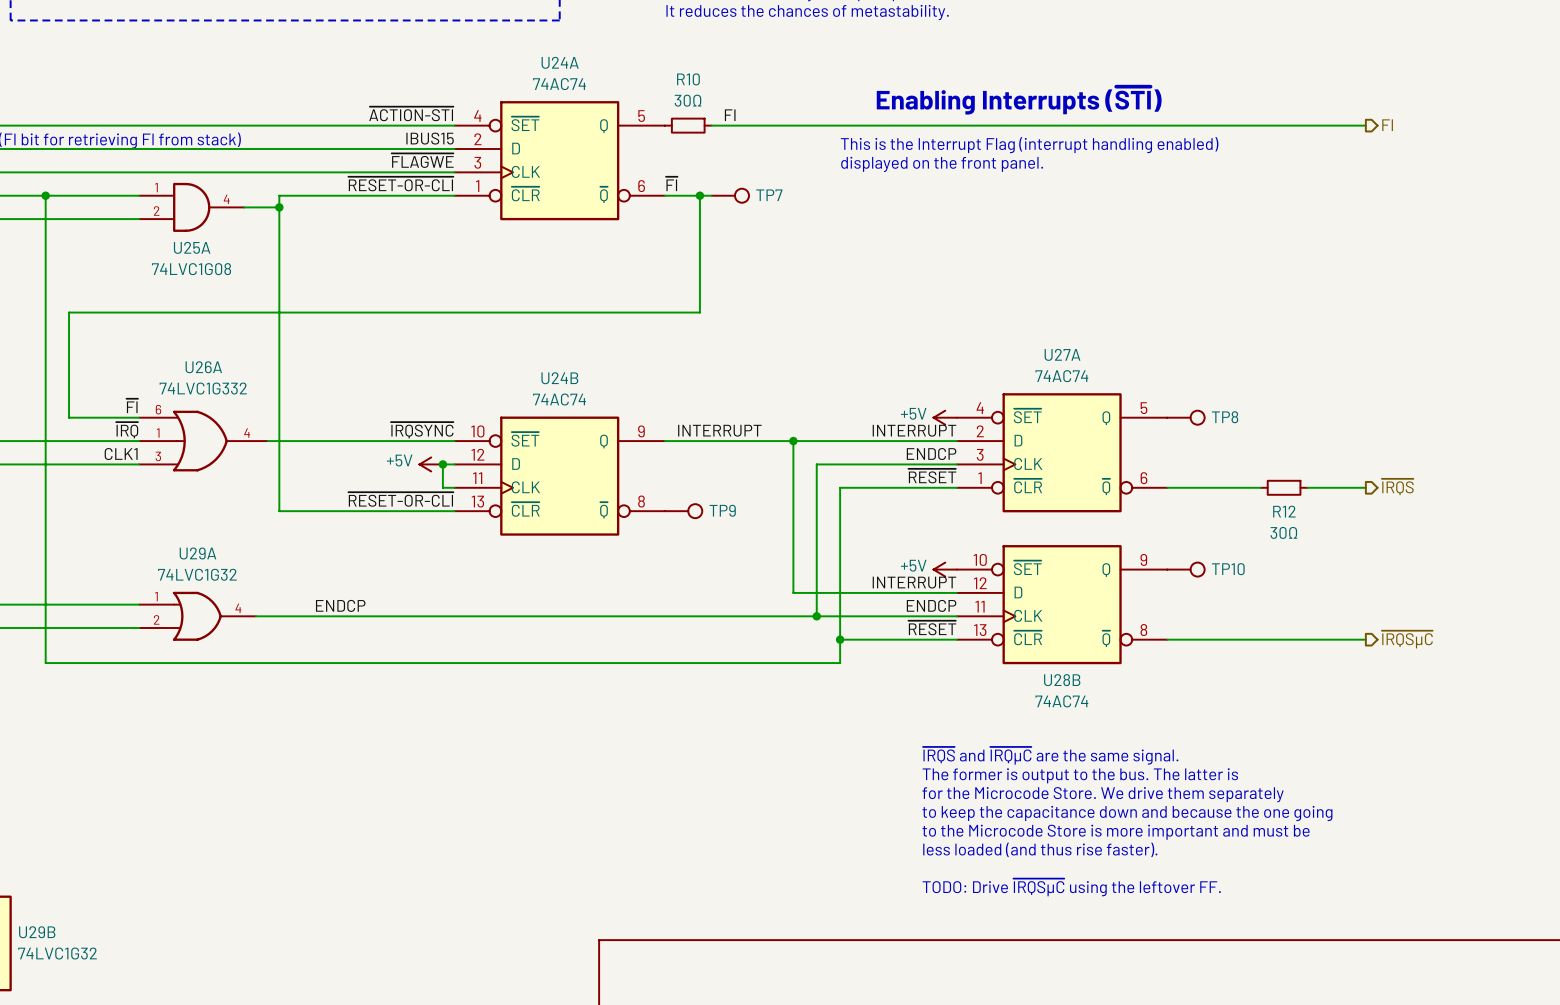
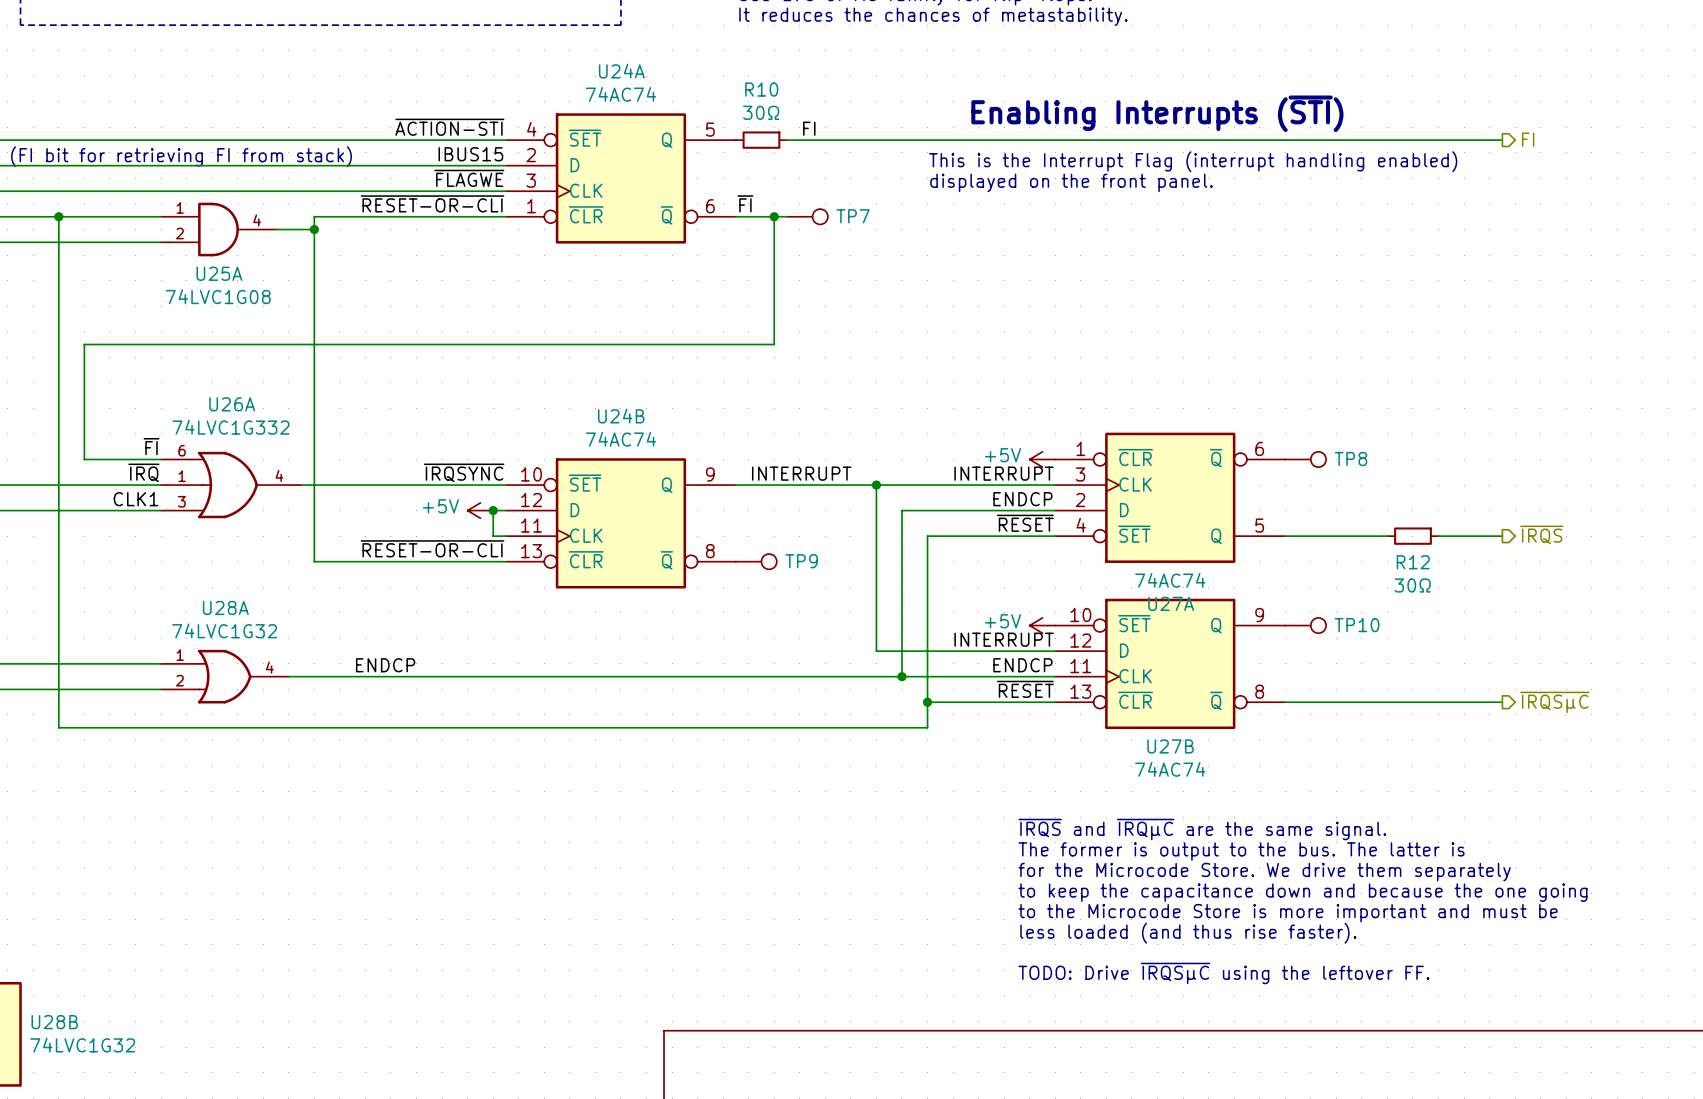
U27A flip: as is (1062, 452) -> up-down (1170, 497)
U29A name: U29A (197, 553) -> U28A (225, 607)
U28B name: U28B (1062, 680) -> U27B (1170, 746)
U29B name: U29B (37, 932) -> U28B (54, 1022)

